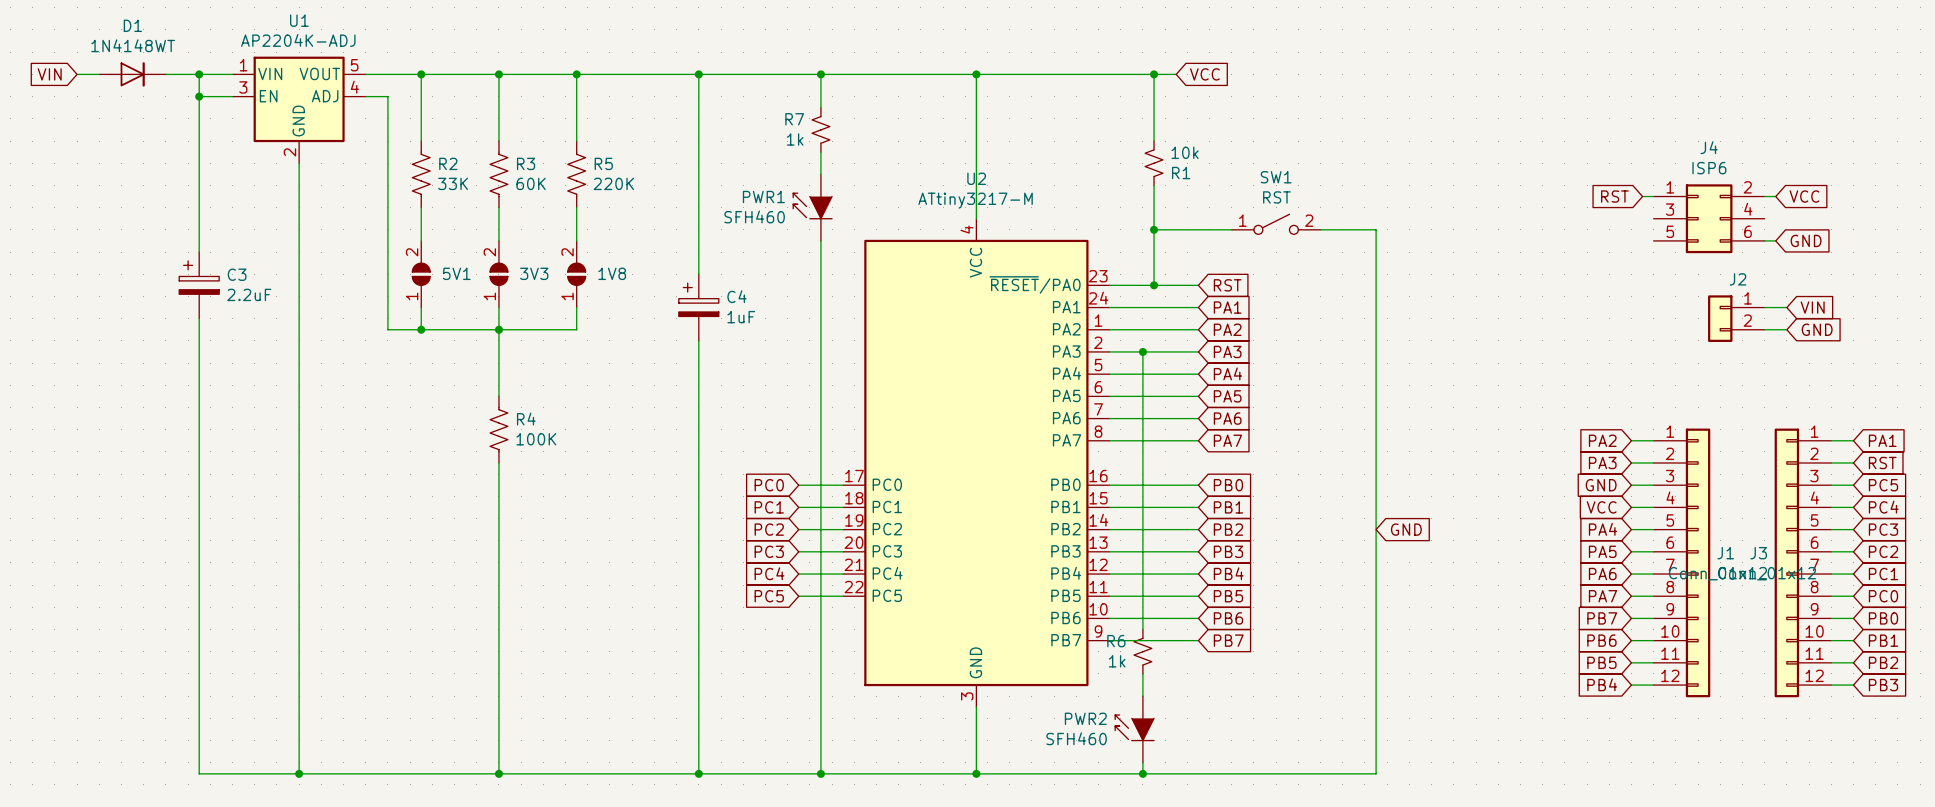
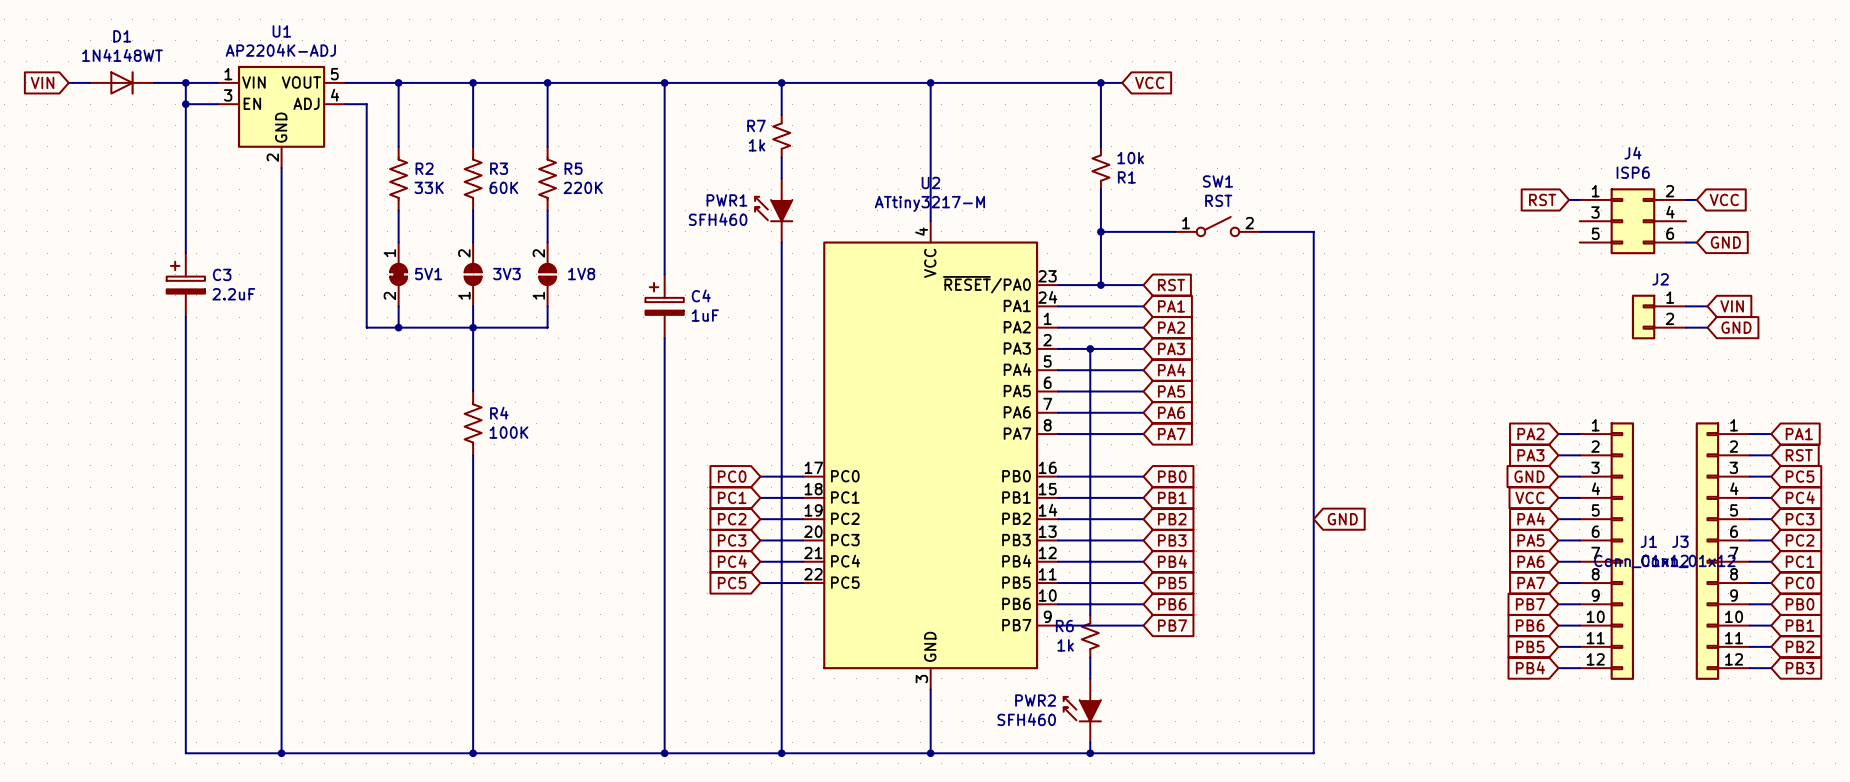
5V1 symbol: [412, 240, 431, 308] -> [390, 242, 408, 307]

